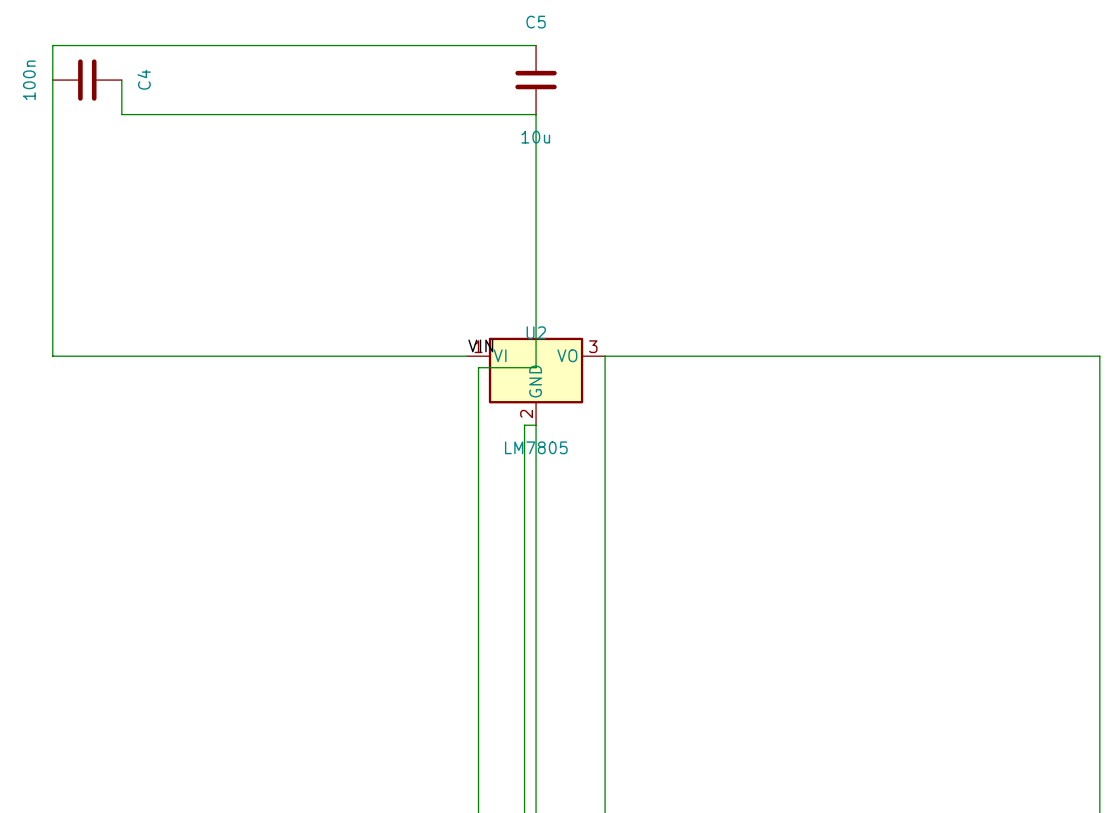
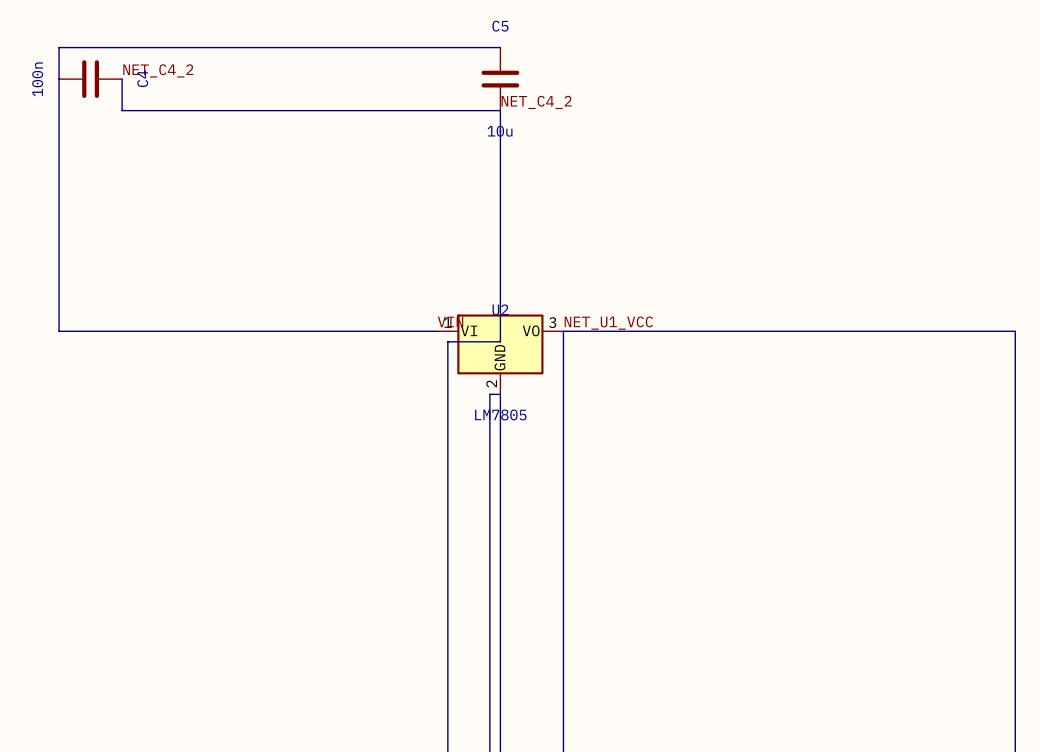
label: none -> NET_C4_2 (158, 70)
label: none -> NET_C4_2 (536, 102)
label: none -> NET_U1_VCC (608, 323)

